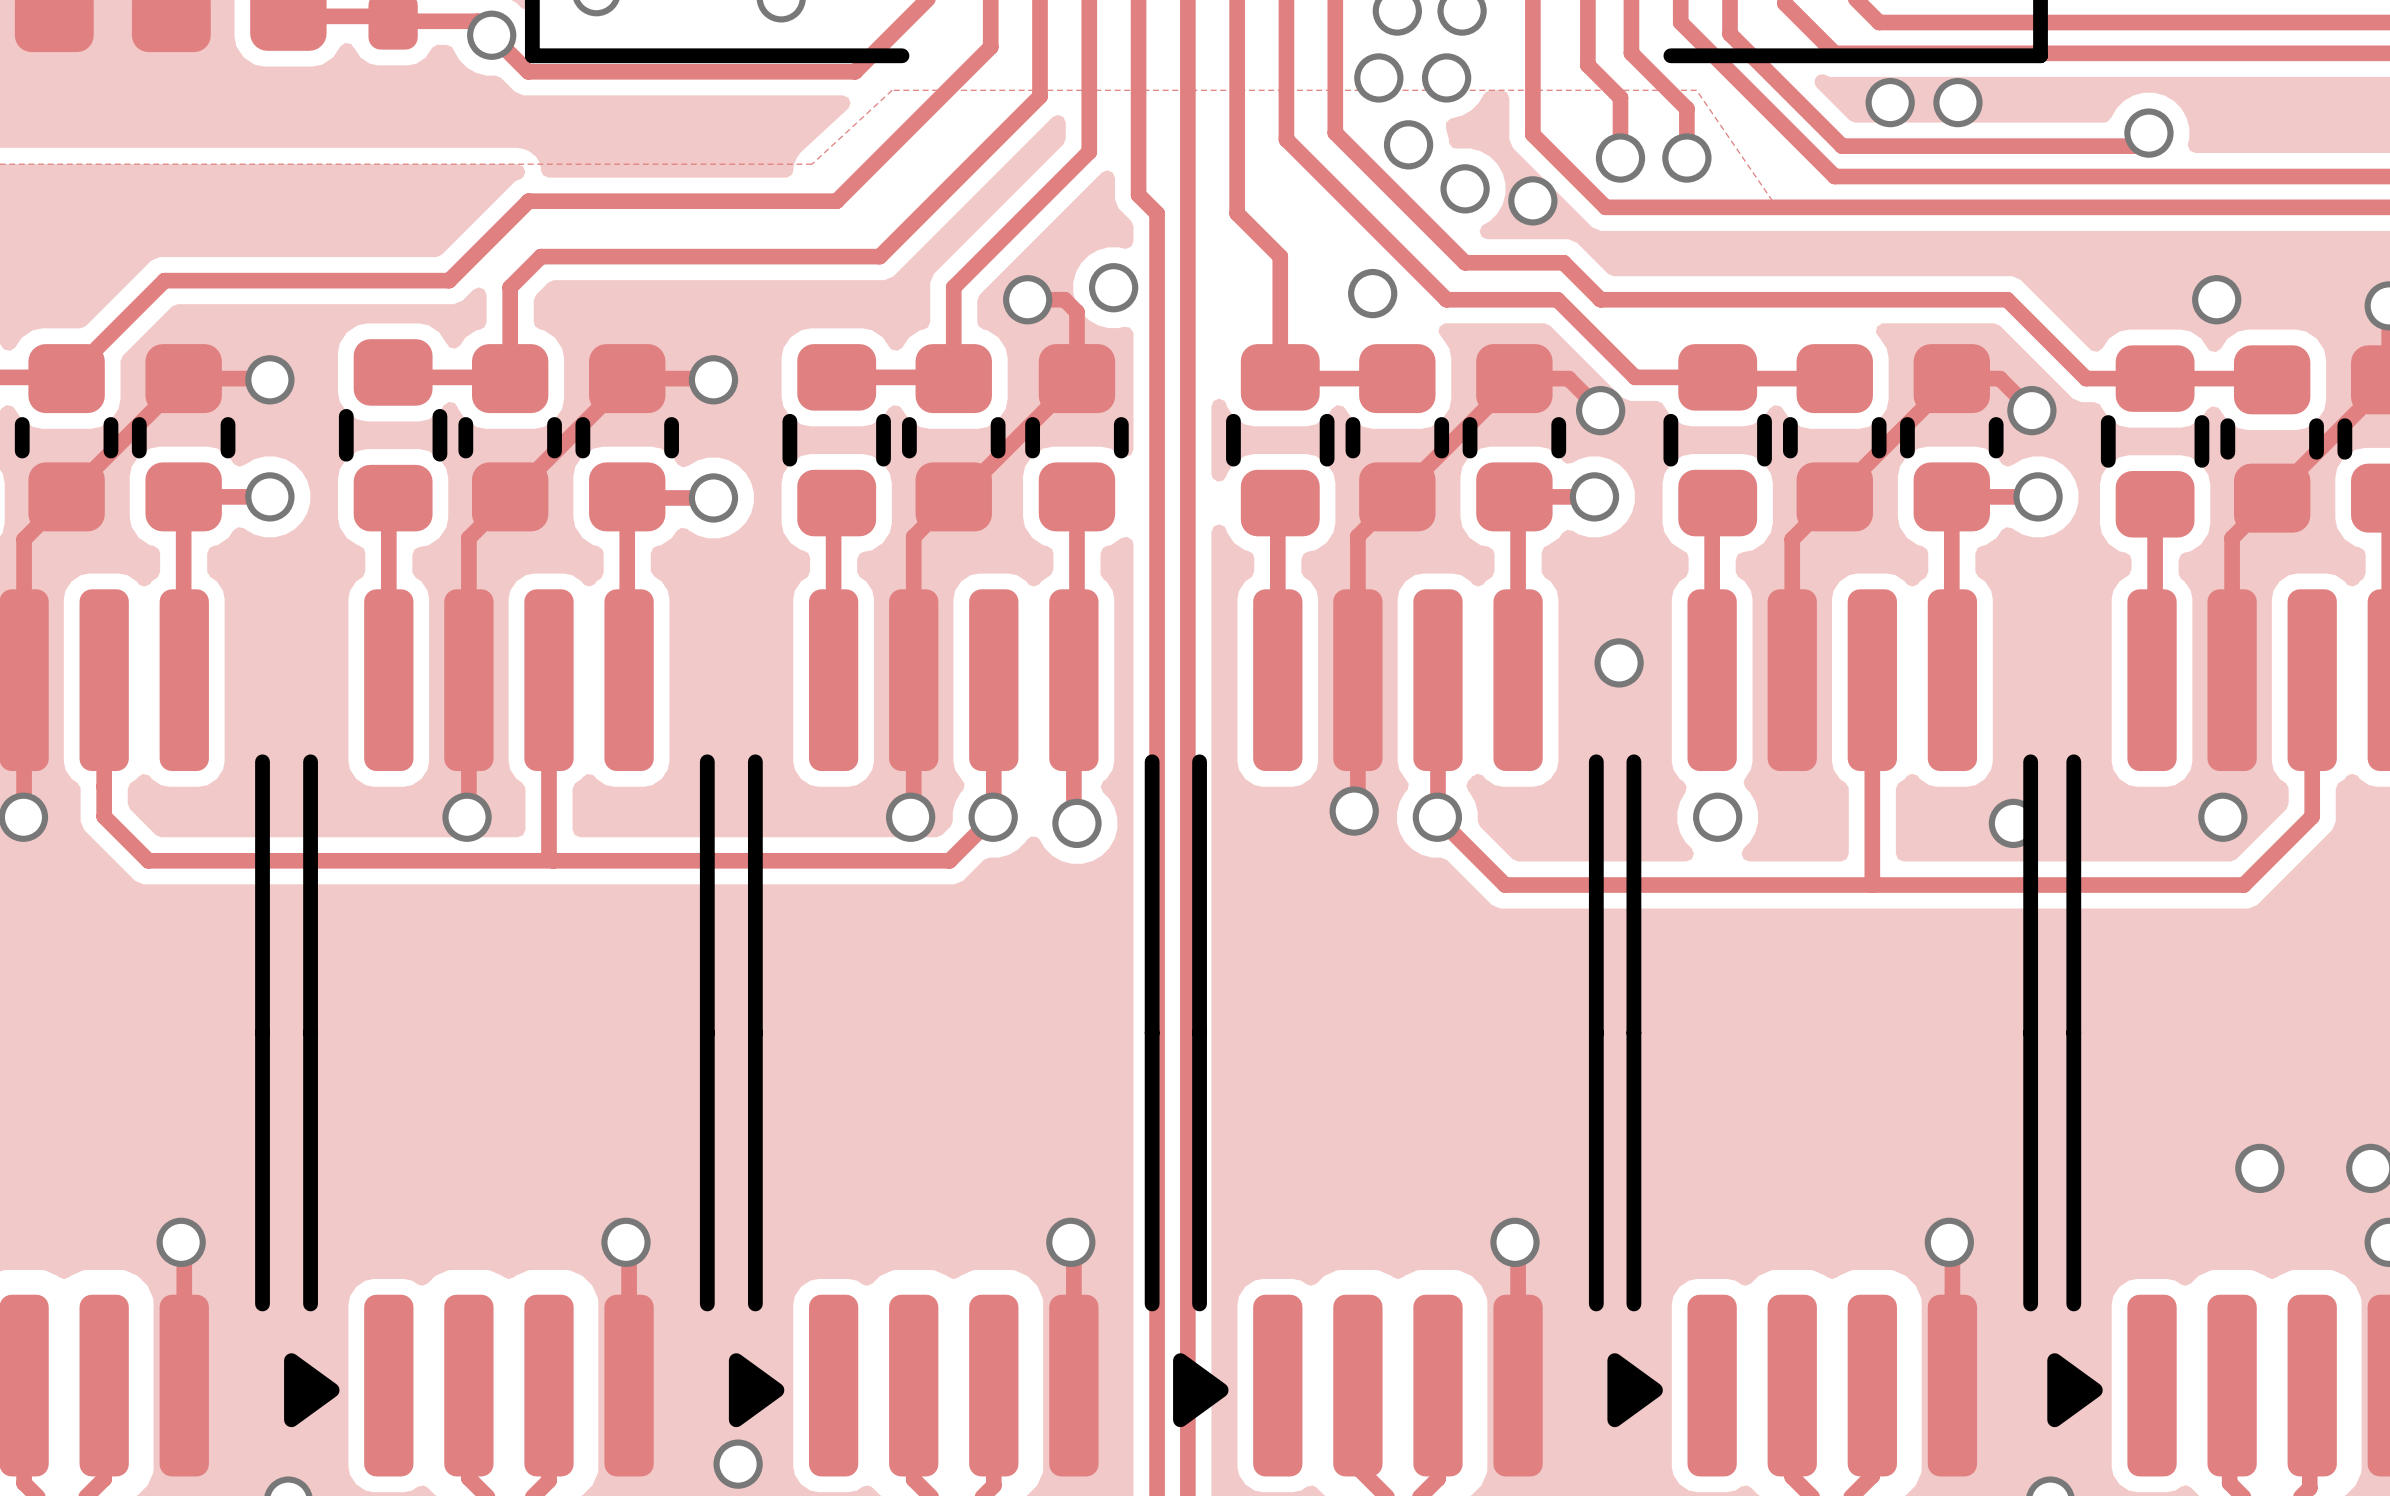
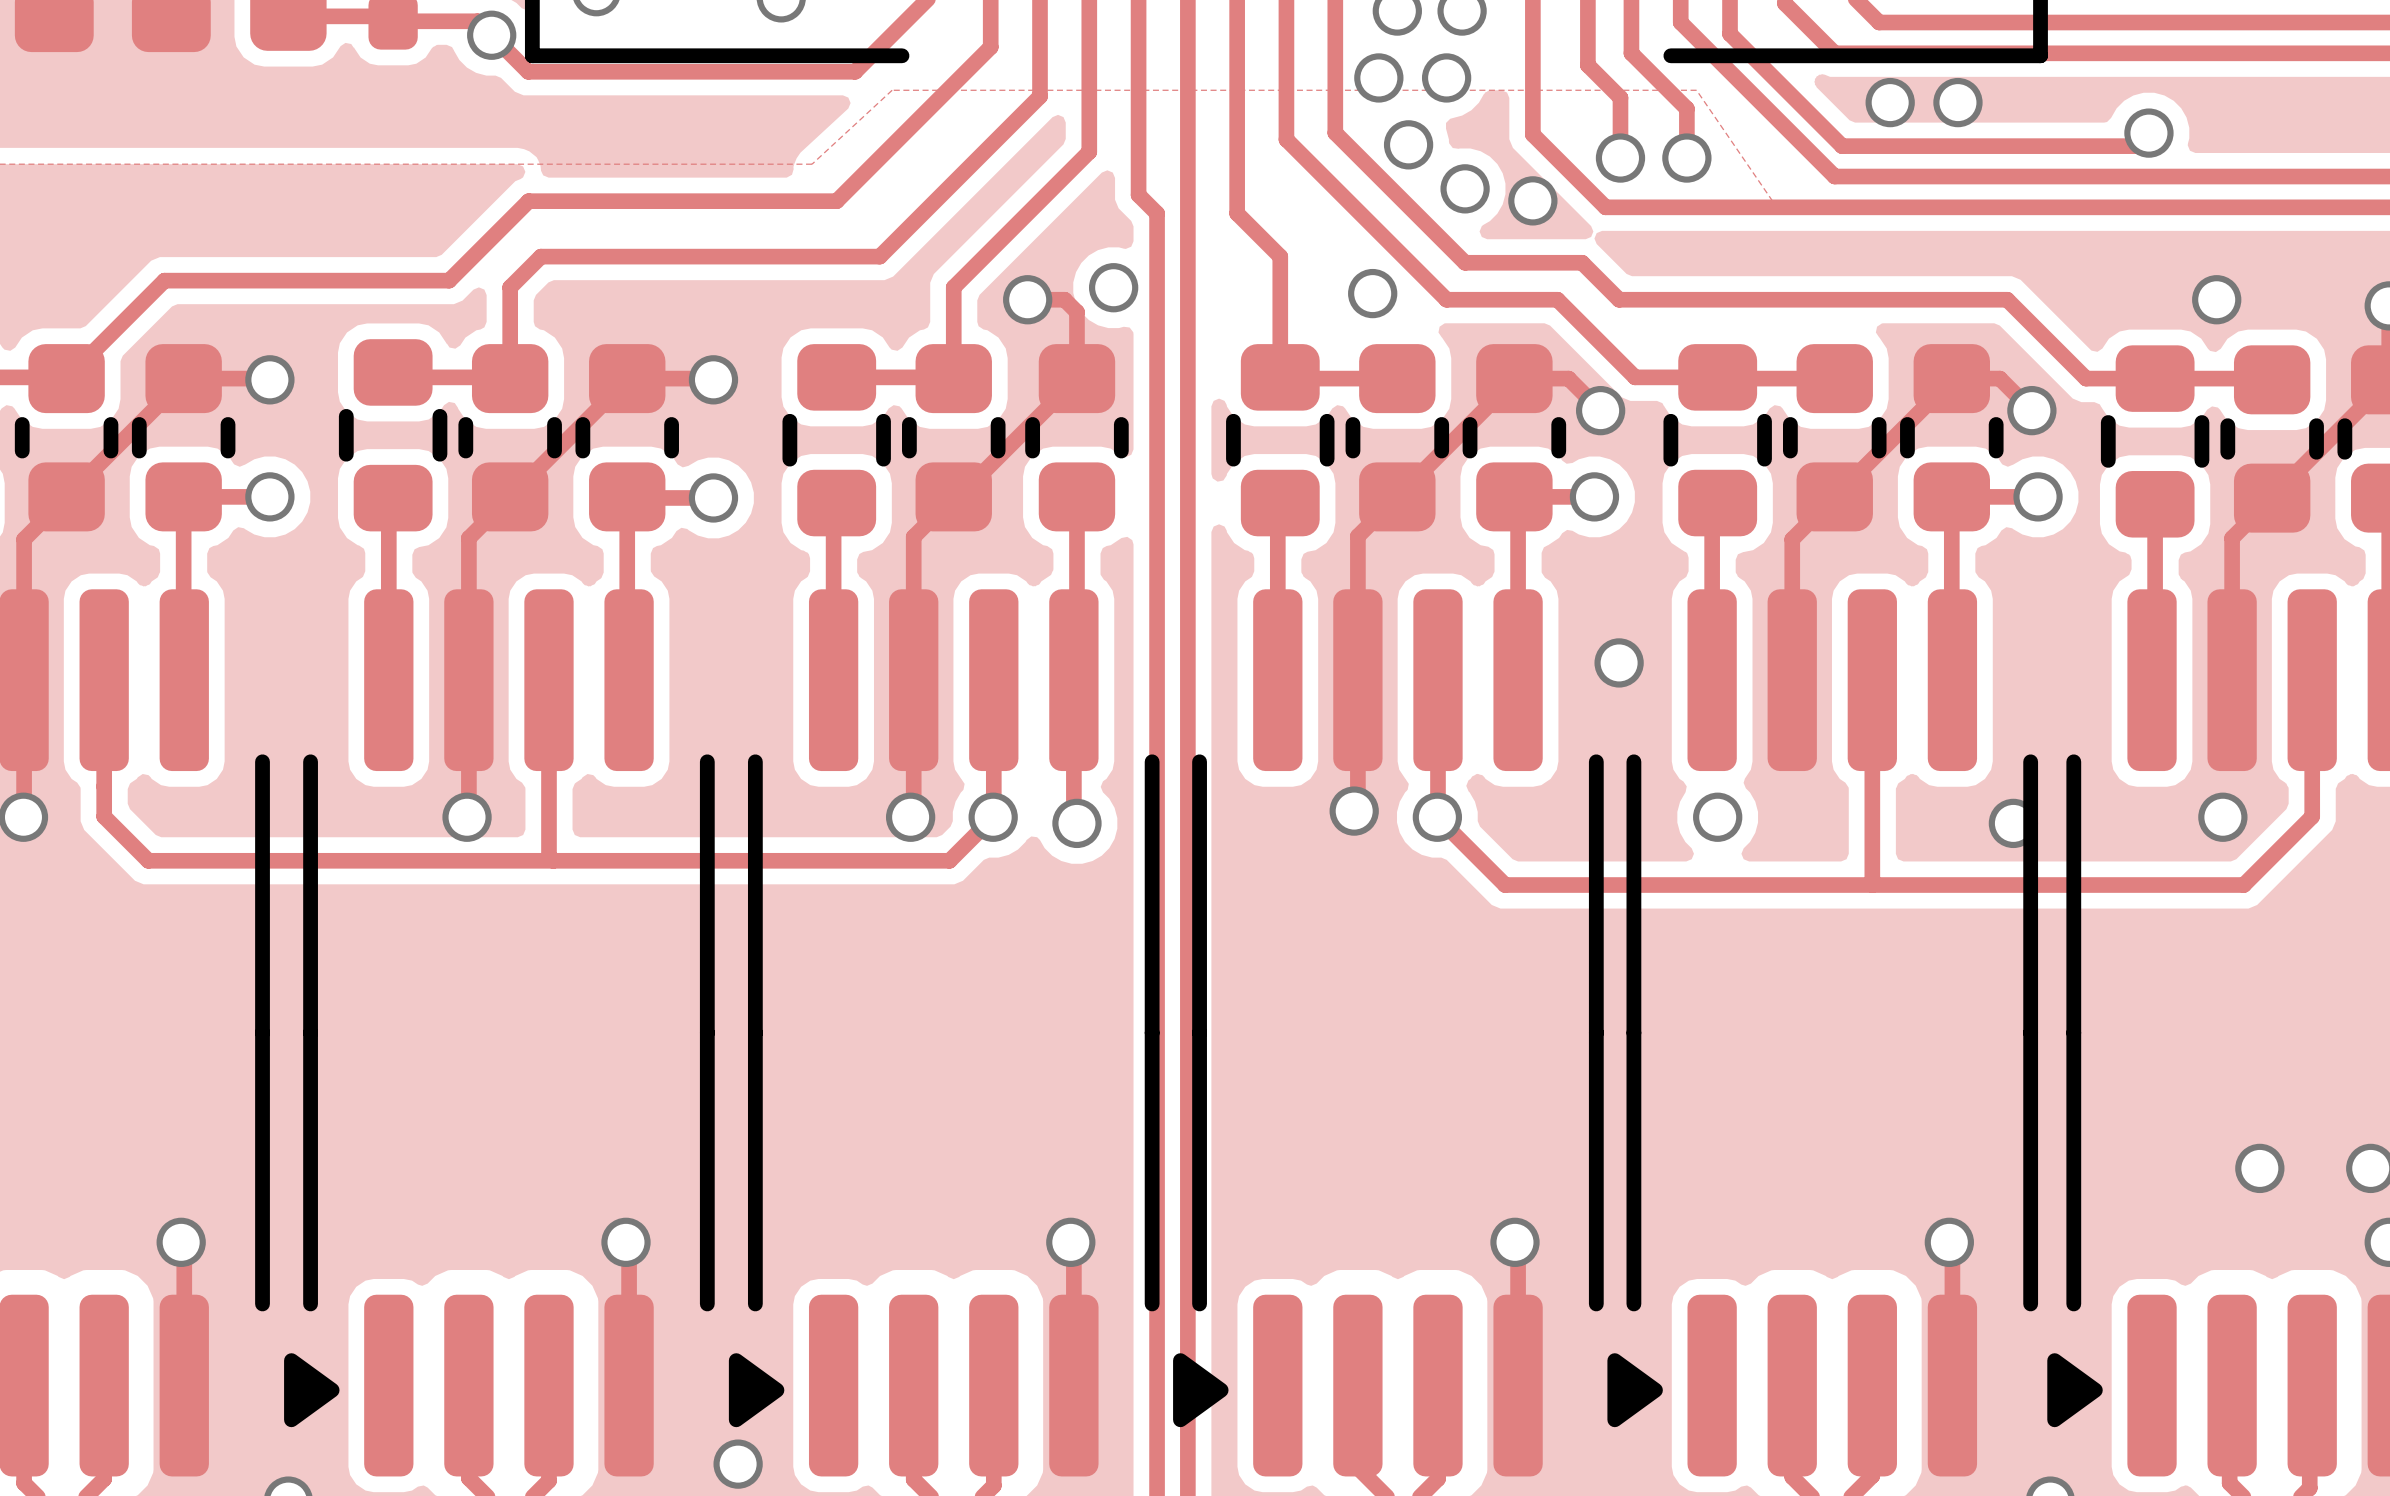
track: (1563, 262) (1600, 299) (1619, 299) -> (1563, 262) (1582, 262) (1619, 299)

